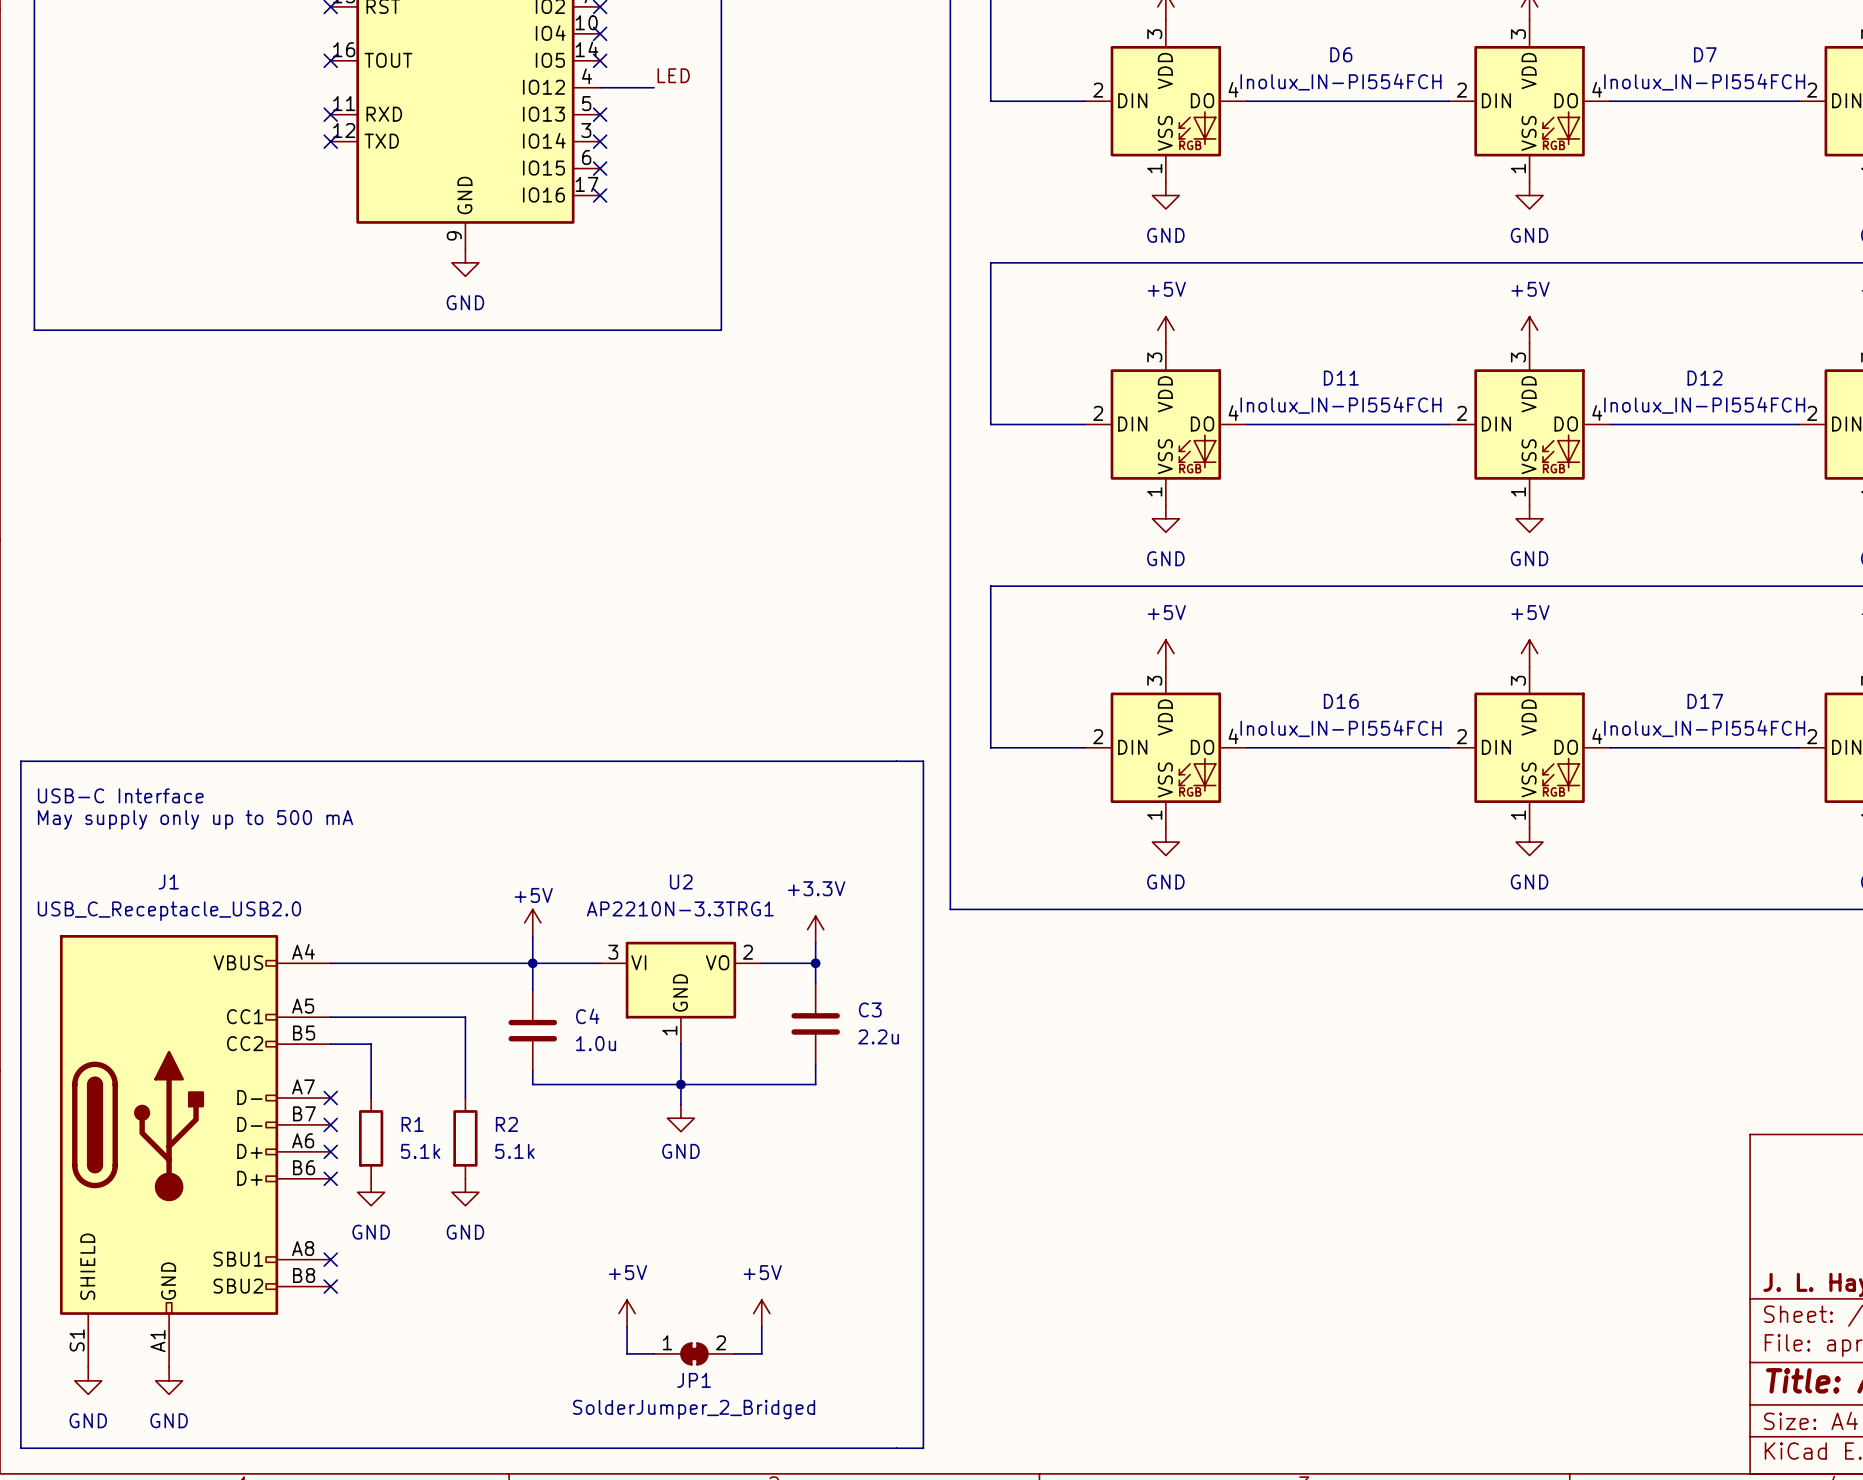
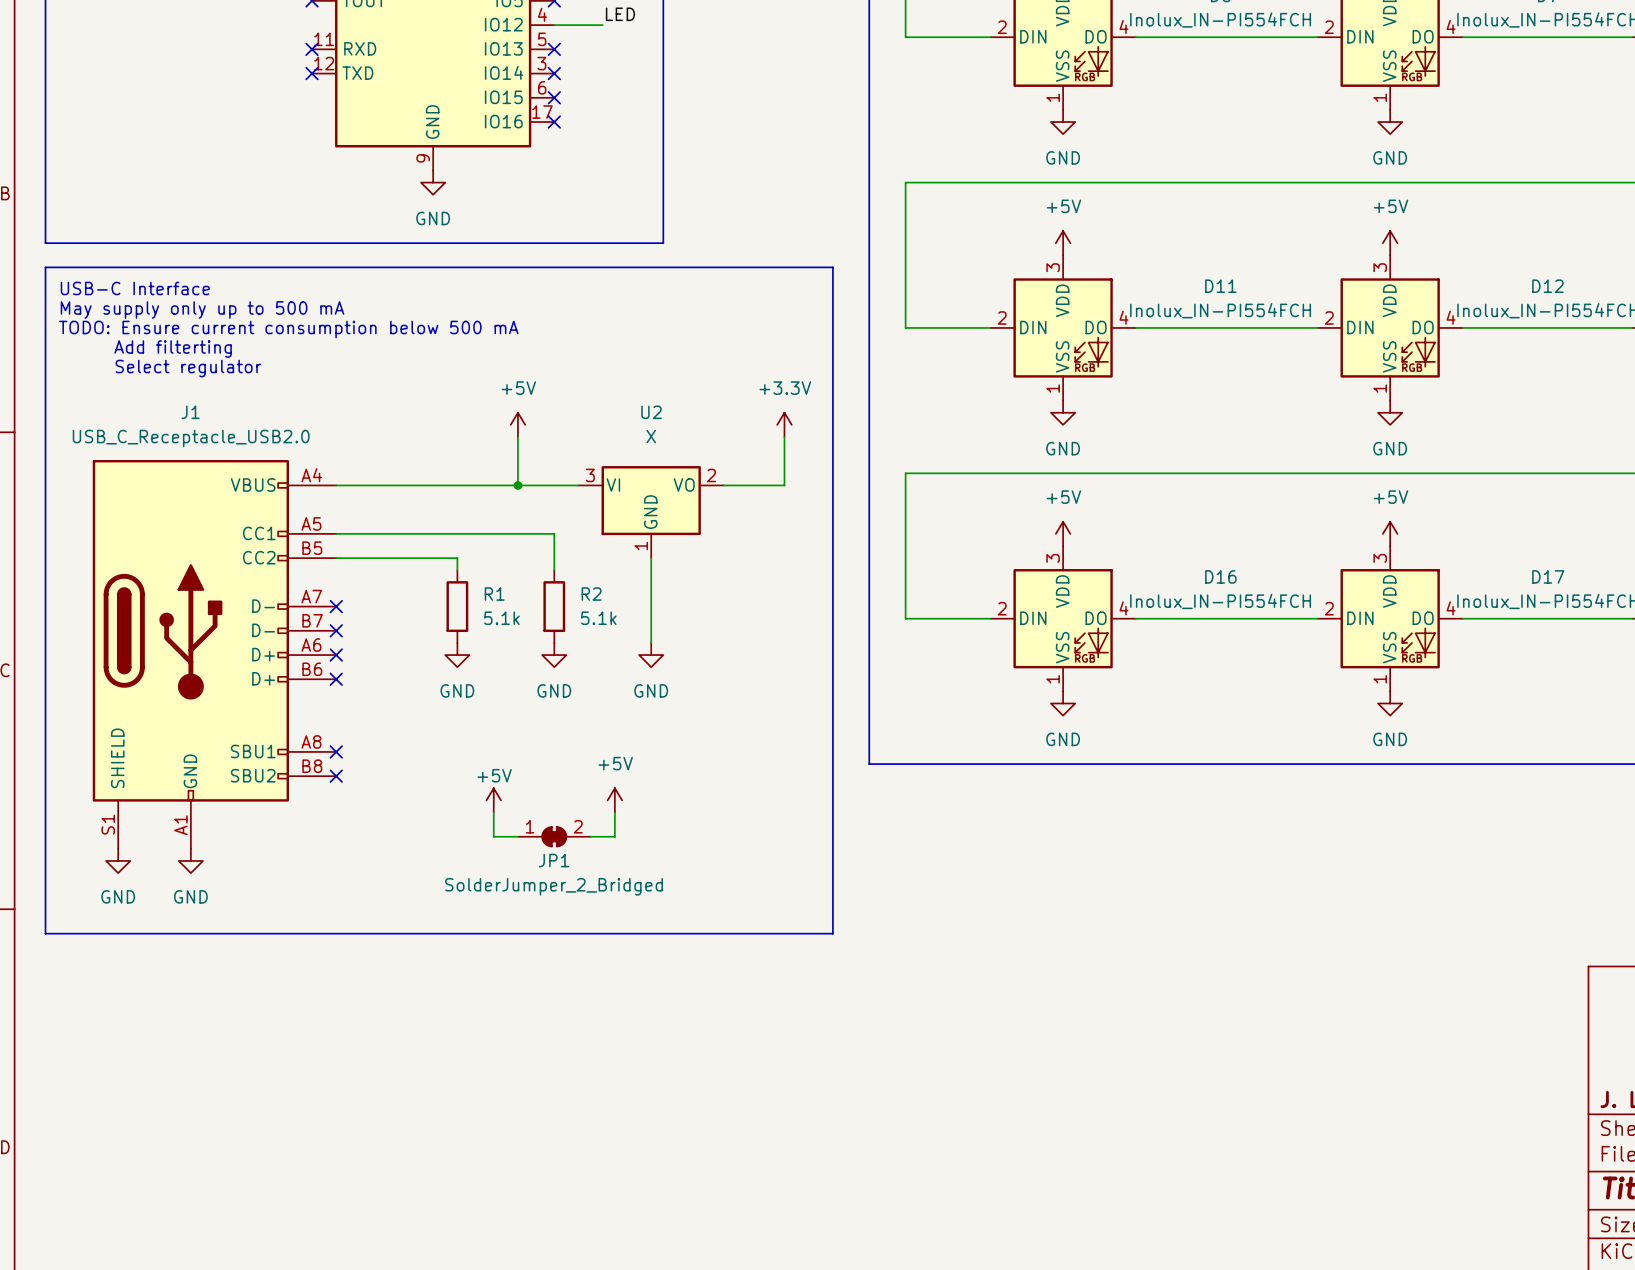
line: none -> (45, 267) (832, 267) (832, 933) (45, 933) (45, 267)
text: none -> USB-C Interface (135, 288)
text: none -> May supply only up to 500 mA (202, 310)
text: none -> TODO: Ensure current consumption below 500 mA (288, 329)
text: none -> Add filterting (173, 349)
text: none -> Select regulator (188, 368)
power symbol: none -> +5V (517, 424)
power symbol: none -> +3.3V (784, 424)
wire: none -> (517, 436) (517, 485)
wire: none -> (784, 436) (784, 485) (723, 485)
wire: none -> (336, 485) (578, 485)
junction: none -> (517, 485)
wire: none -> (336, 533) (554, 533) (554, 570)
wire: none -> (336, 558) (457, 558) (457, 570)
wire: none -> (651, 558) (651, 642)
no-connect mark: none -> (336, 606)
line: (20, 761) (923, 761) (923, 1448) (20, 1448) (20, 761) -> none
no-connect mark: none -> (336, 630)
no-connect mark: none -> (336, 655)
power symbol: none -> GND (457, 655)
power symbol: none -> GND (554, 655)
power symbol: none -> GND (651, 655)
text: USB-C Interface (120, 795) -> none
no-connect mark: none -> (336, 679)
text: May supply only up to 500 mA (195, 819) -> none
no-connect mark: none -> (336, 751)
U2 value: AP2210N-3.3TRG1 (680, 908) -> X (651, 436)
no-connect mark: none -> (336, 776)
power symbol position: +5V (532, 922) -> +5V (493, 800)
power symbol: +3.3V (815, 929) -> none
wire: (815, 943) (815, 983) -> none
power symbol: none -> +5V (614, 800)
wire: (330, 963) (600, 963) -> none
junction: (532, 963) -> none
wire: (761, 963) (815, 963) -> none
junction: (815, 963) -> none
wire: none -> (493, 836) (517, 836)
U2 position: (680, 992) -> (651, 512)
power symbol: none -> GND (118, 860)
power symbol: none -> GND (190, 860)
wire: (330, 1017) (465, 1017) (465, 1098) -> none
C3: 2.2u (815, 1023) -> none
C4: 1.0u (532, 1030) -> none
wire: (330, 1044) (371, 1044) (371, 1098) -> none
wire: (680, 1044) (680, 1104) -> none
wire: (815, 1064) (815, 1084) (532, 1084) (532, 1071) -> none
junction: (680, 1084) -> none
no-connect mark: (330, 1098) -> none
power symbol: GND (680, 1118) -> none
no-connect mark: (330, 1124) -> none
R1 position: (371, 1138) -> (457, 606)
R2 position: (465, 1138) -> (554, 606)
J1 position: (195, 1151) -> (214, 654)
no-connect mark: (330, 1151) -> none
no-connect mark: (330, 1178) -> none
power symbol: GND (371, 1192) -> none
power symbol: GND (465, 1192) -> none
no-connect mark: (330, 1259) -> none
no-connect mark: (330, 1286) -> none
power symbol: +5V (627, 1313) -> none
power symbol: +5V (761, 1313) -> none
wire: (627, 1327) (627, 1353) (654, 1353) -> none
wire: (761, 1327) (761, 1353) (734, 1353) -> none
JP1 position: (694, 1353) -> (554, 836)
power symbol: GND (88, 1380) -> none
power symbol: GND (169, 1380) -> none

